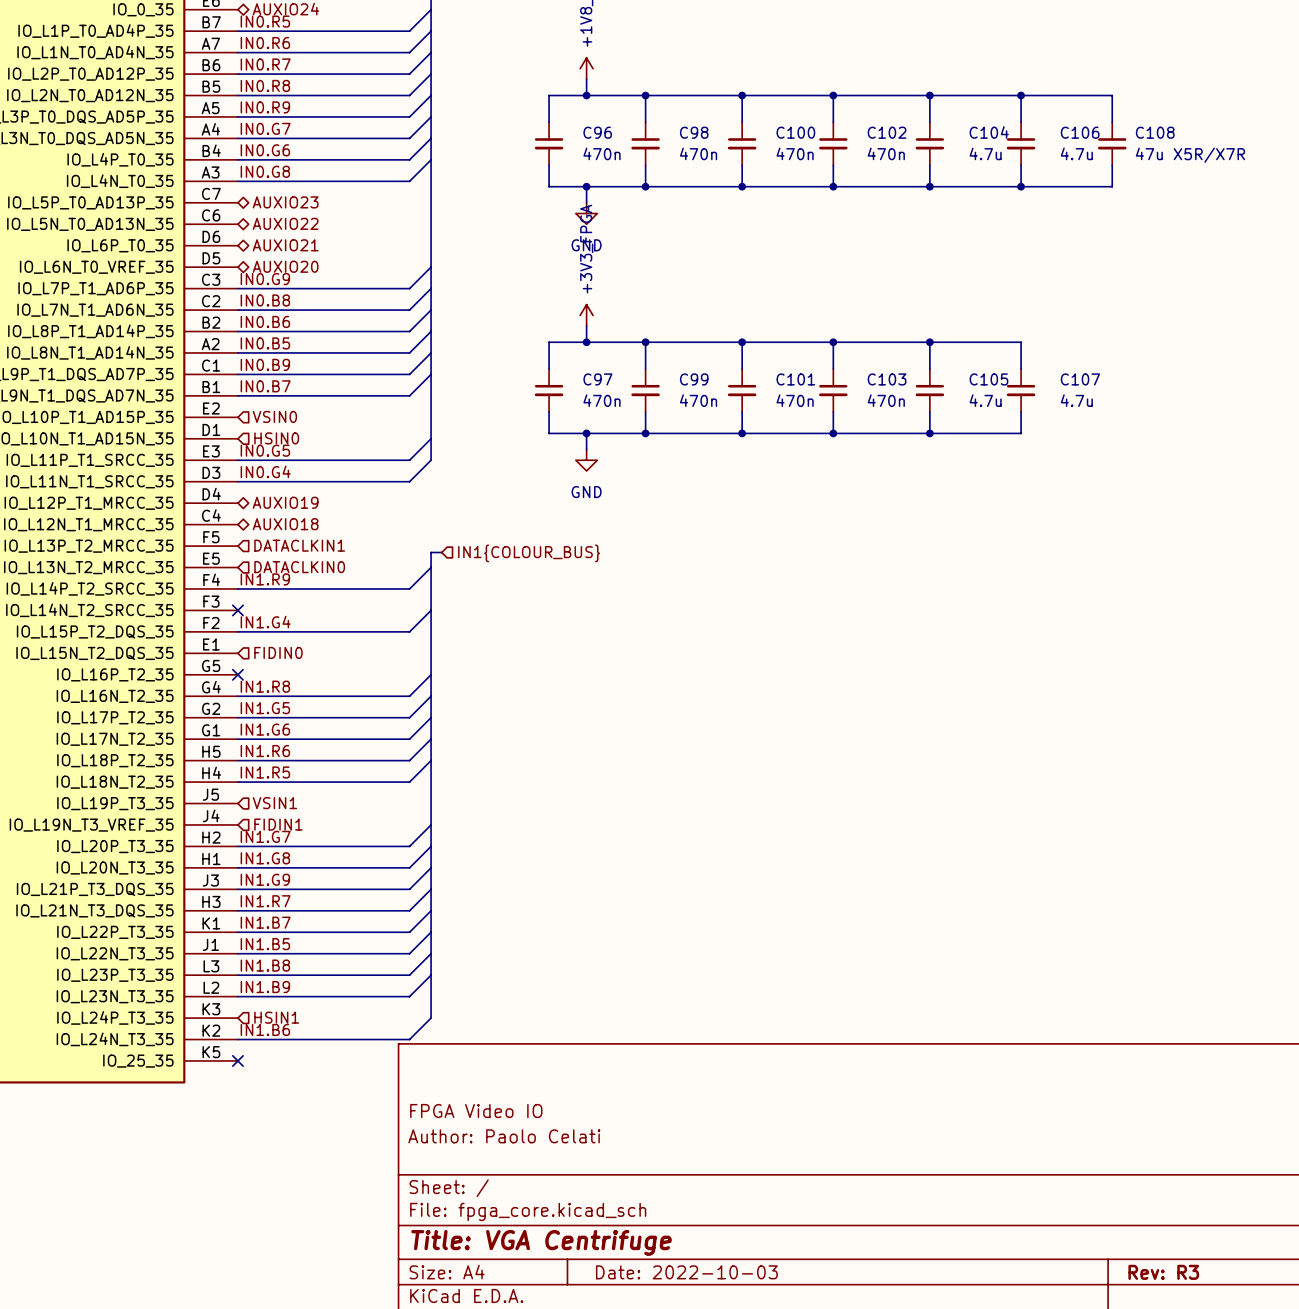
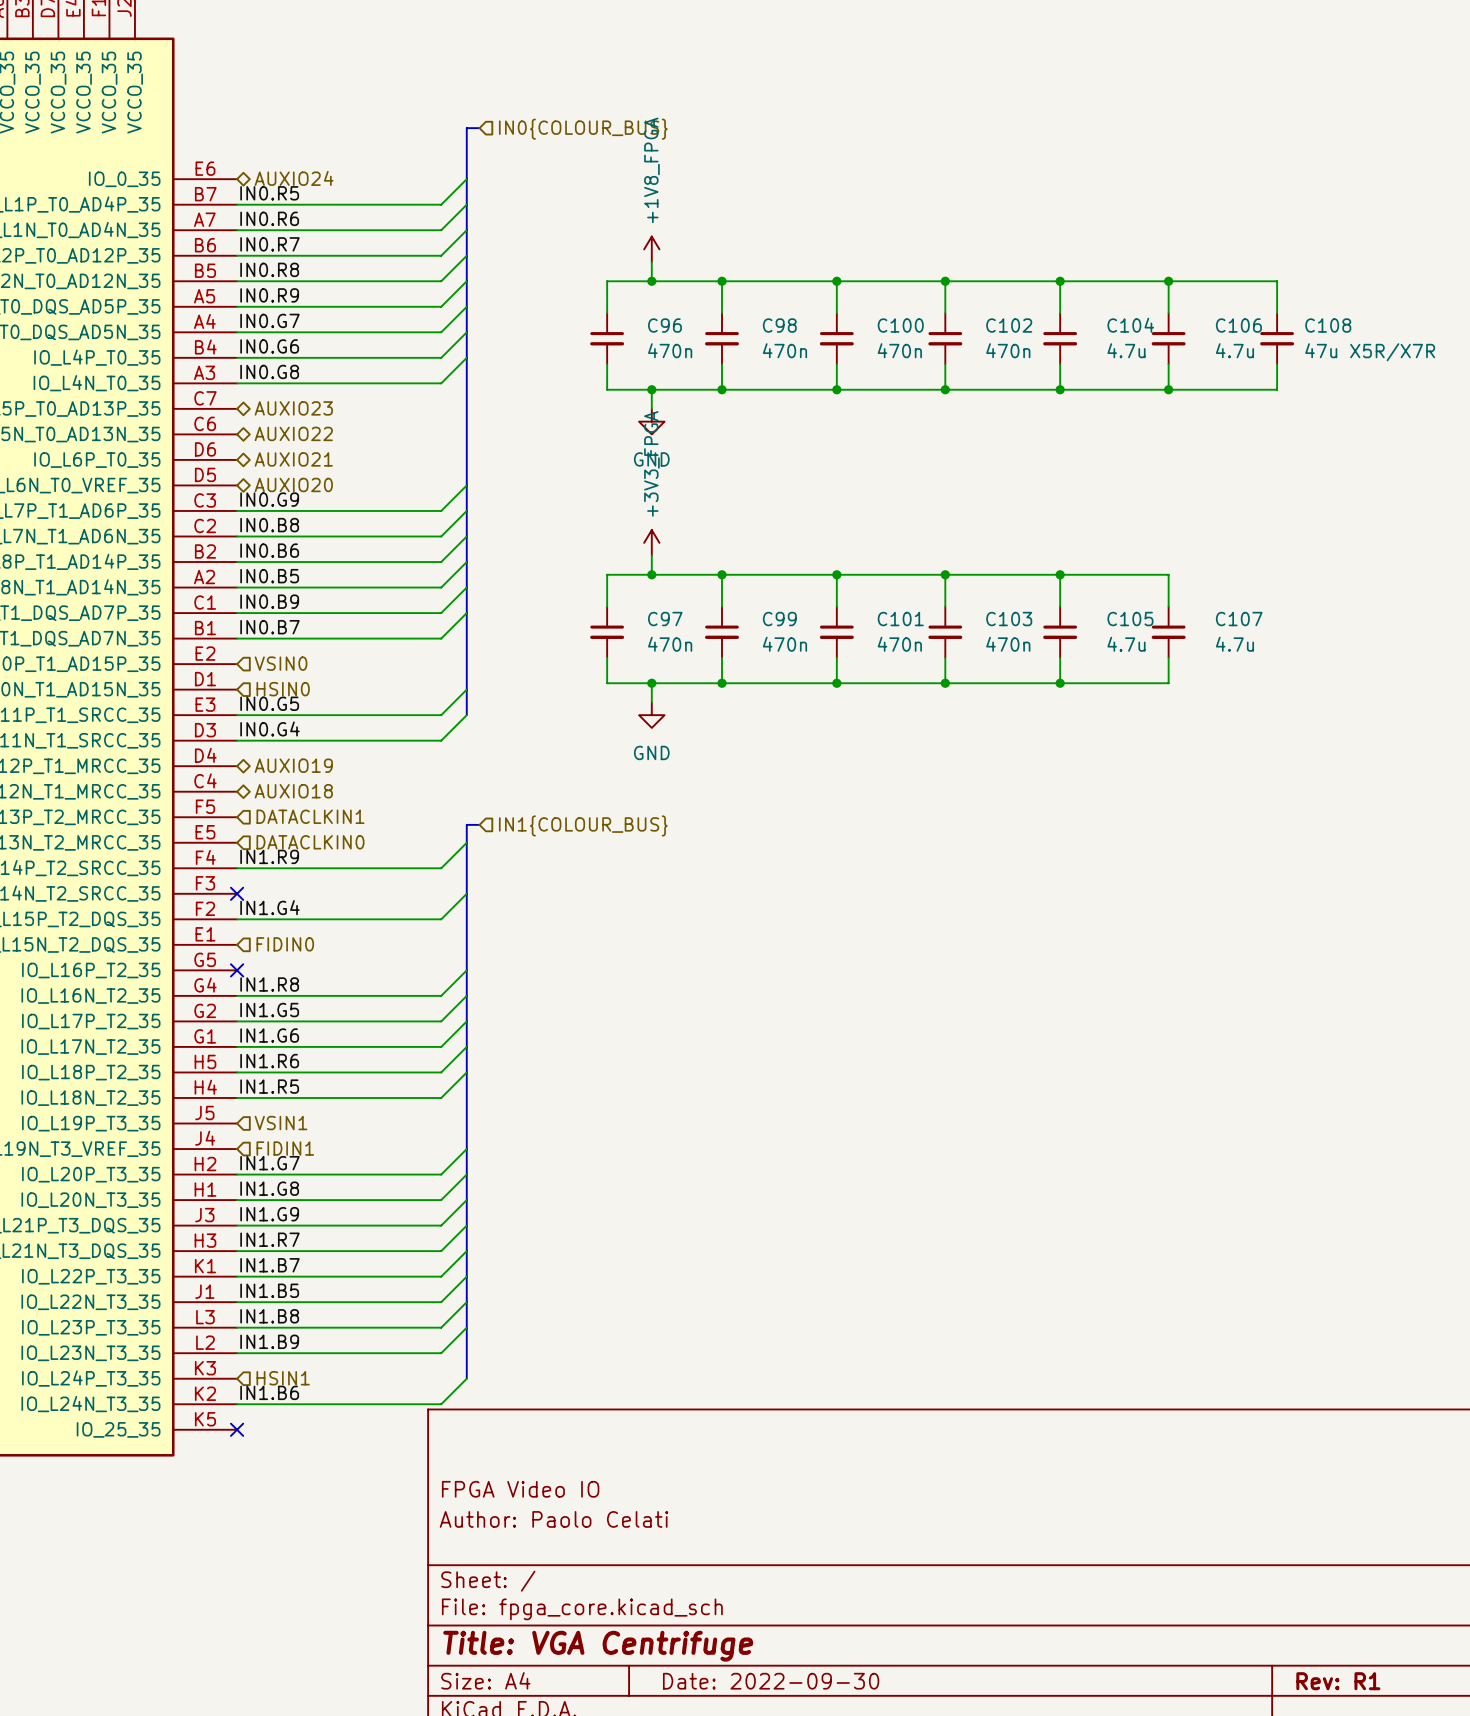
title block: Date: 2022-10-03 (686, 1272) -> Date: 2022-09-30 (771, 1681)
title block: Rev: R3 (1163, 1272) -> Rev: R1 (1338, 1681)

